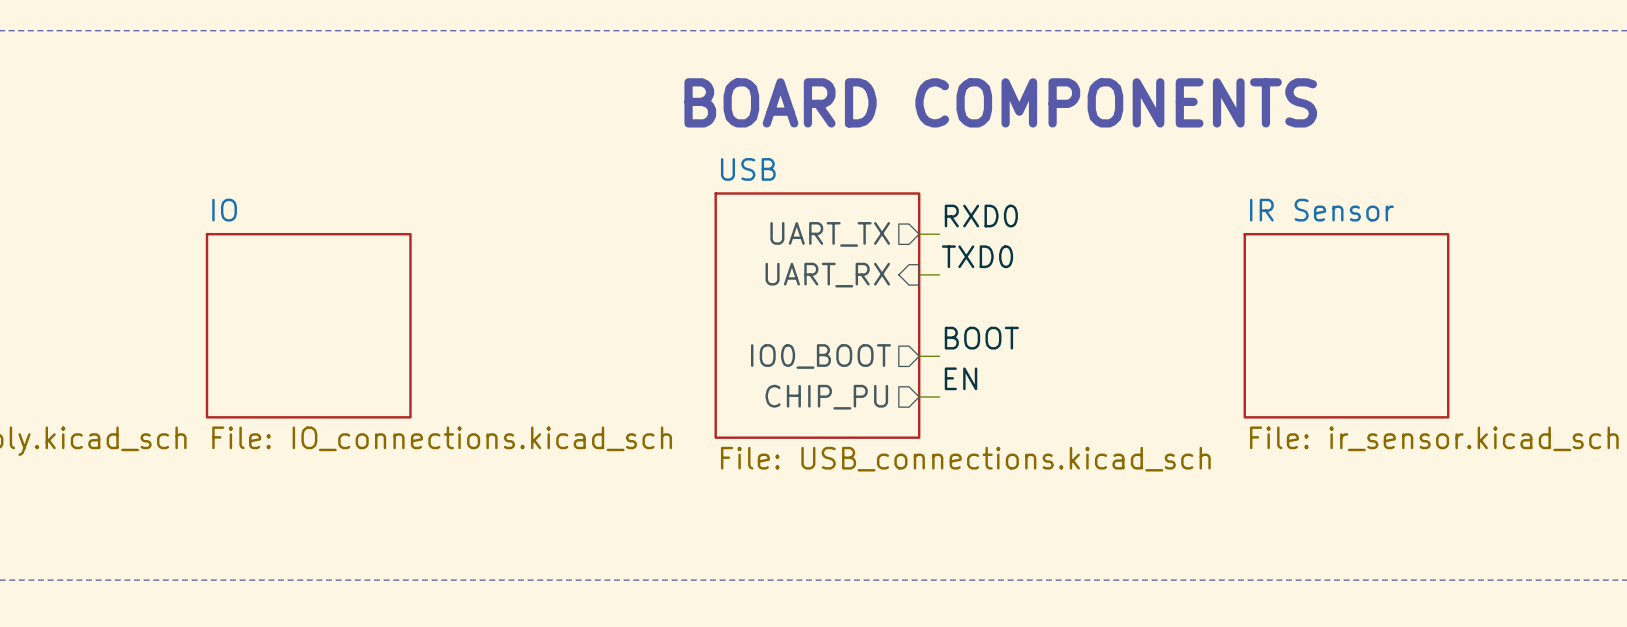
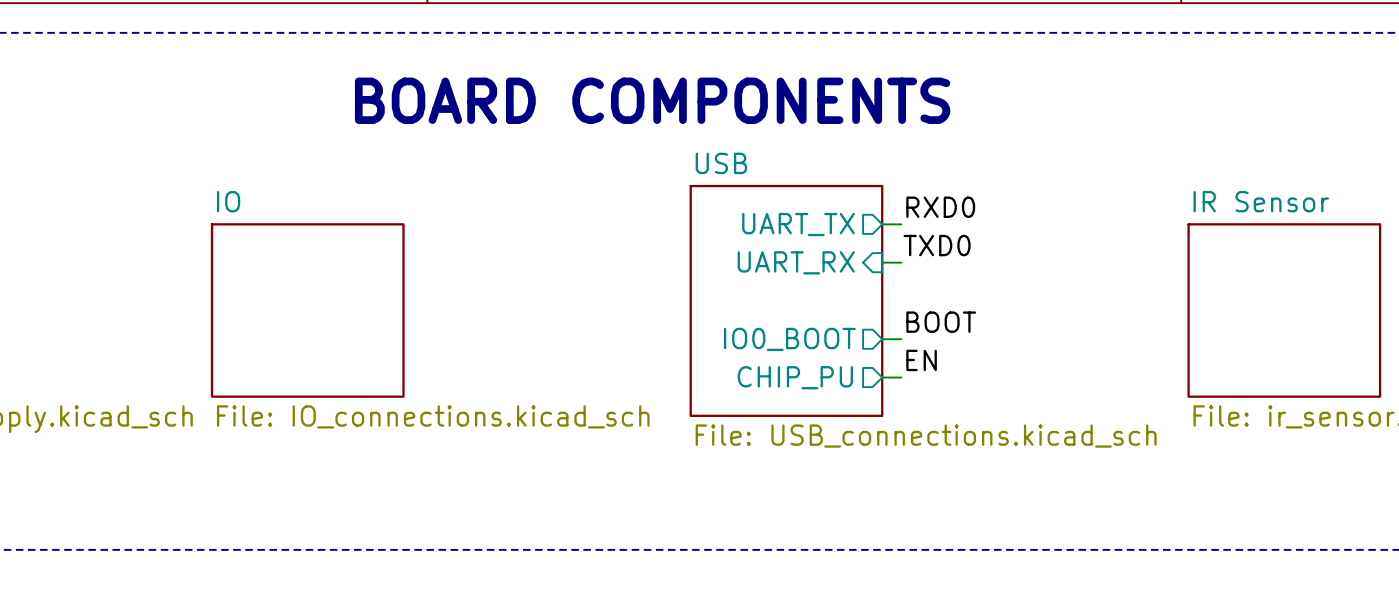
text position: BOARD COMPONENTS (1000, 102) -> BOARD COMPONENTS (652, 100)

